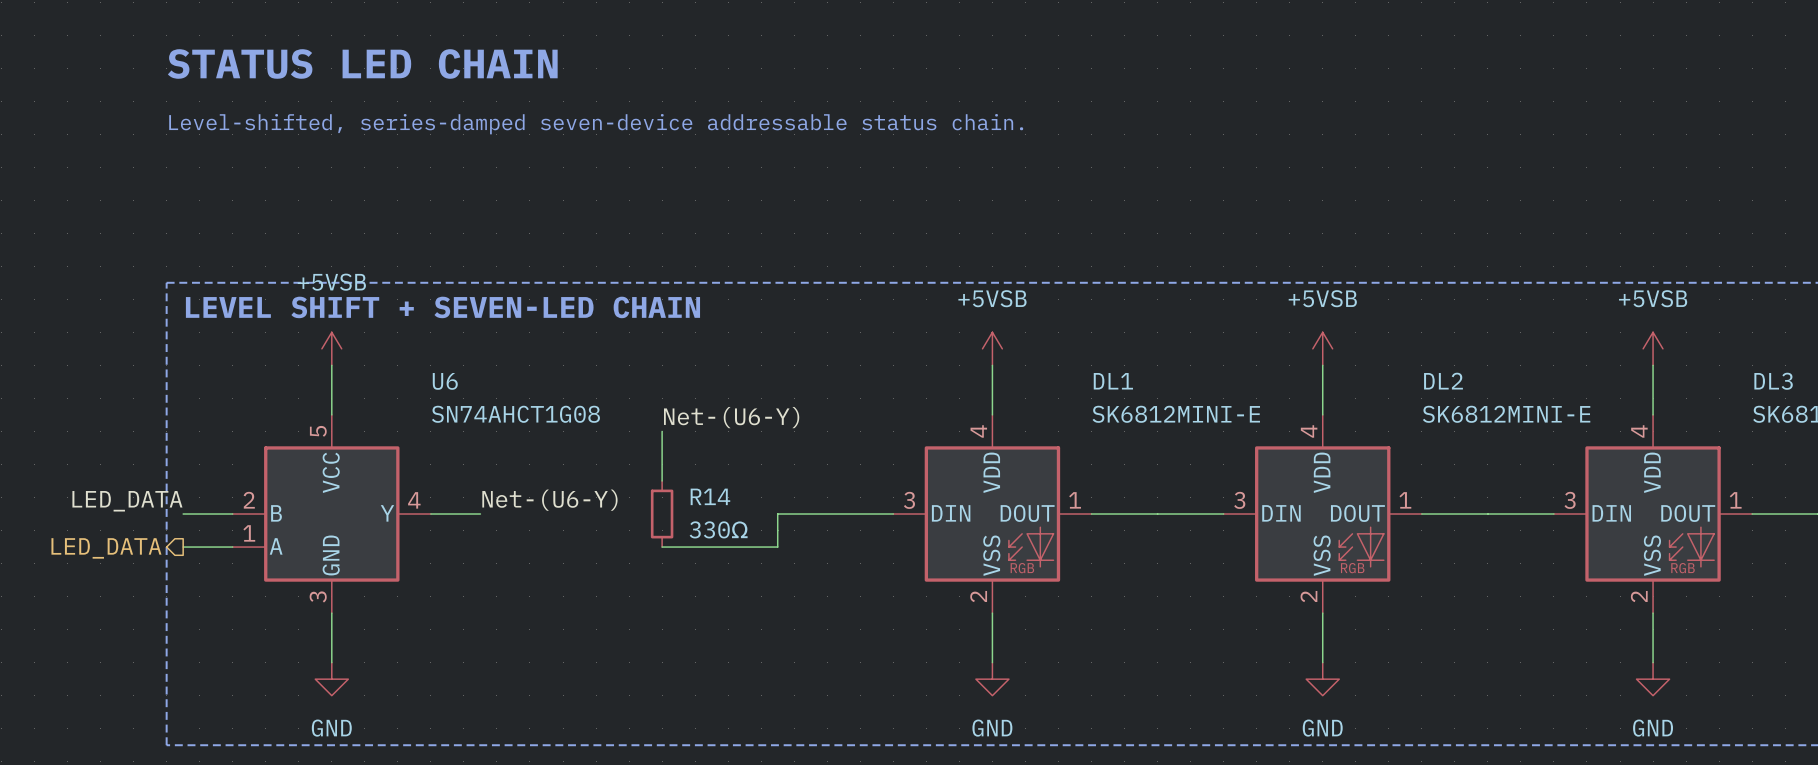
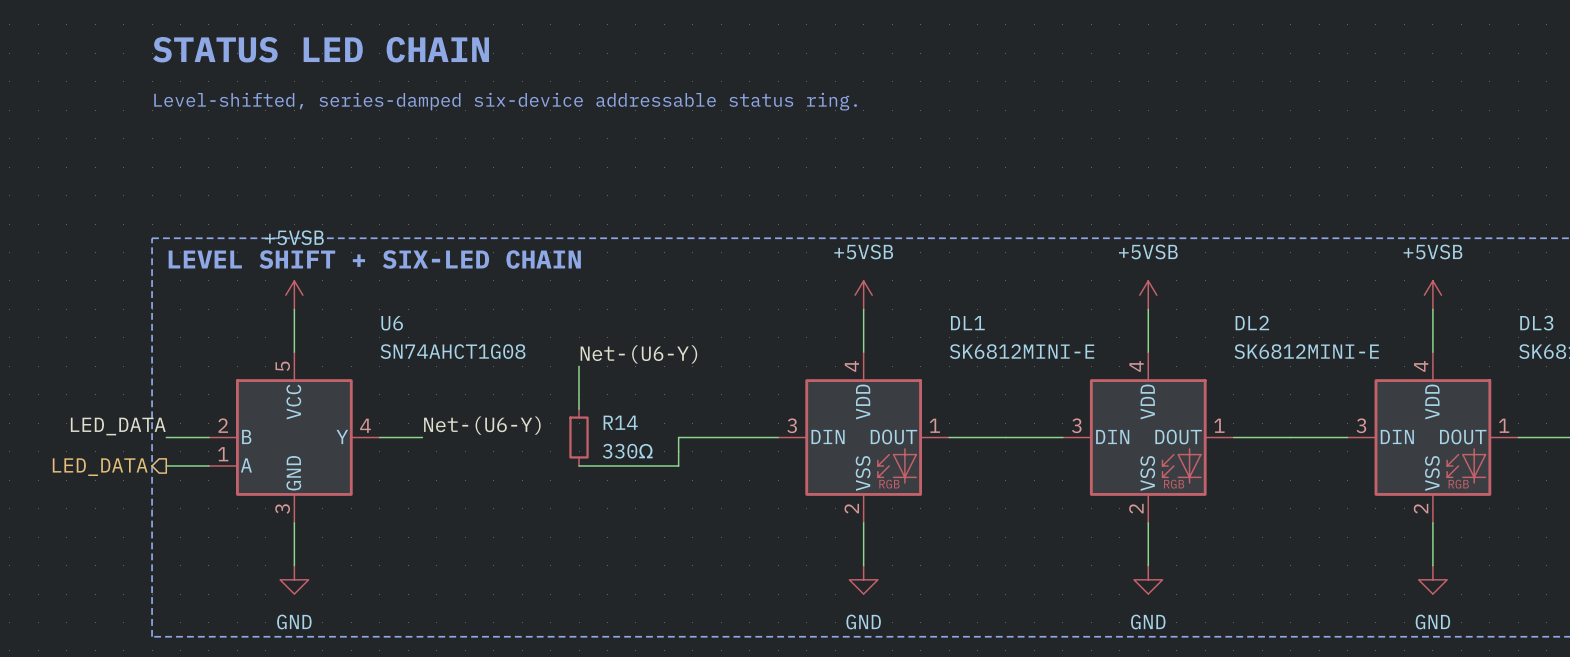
text: Level-shifted, series-damped seven-device addressable status chain. (596, 124) -> Level-shifted, series-damped six-device addressable status ring. (505, 101)
text: LEVEL SHIFT + SEVEN-LED CHAIN (442, 307) -> LEVEL SHIFT + SIX-LED CHAIN (374, 259)

